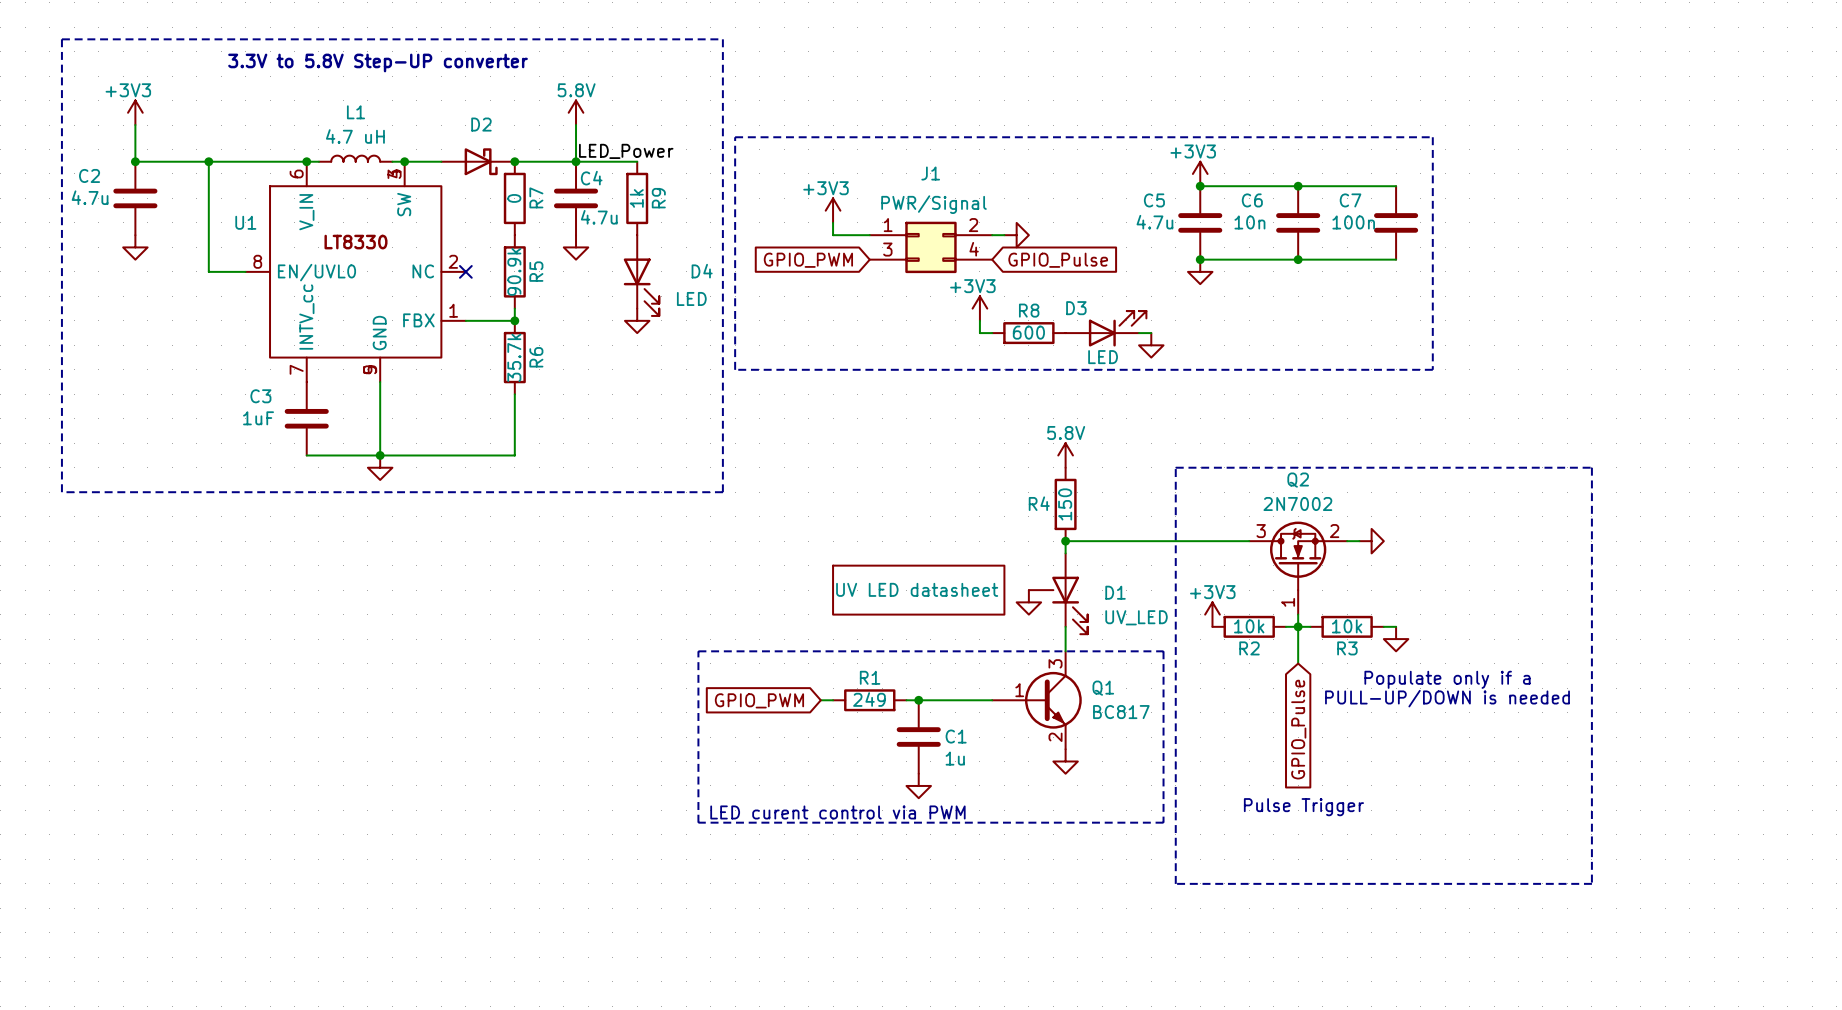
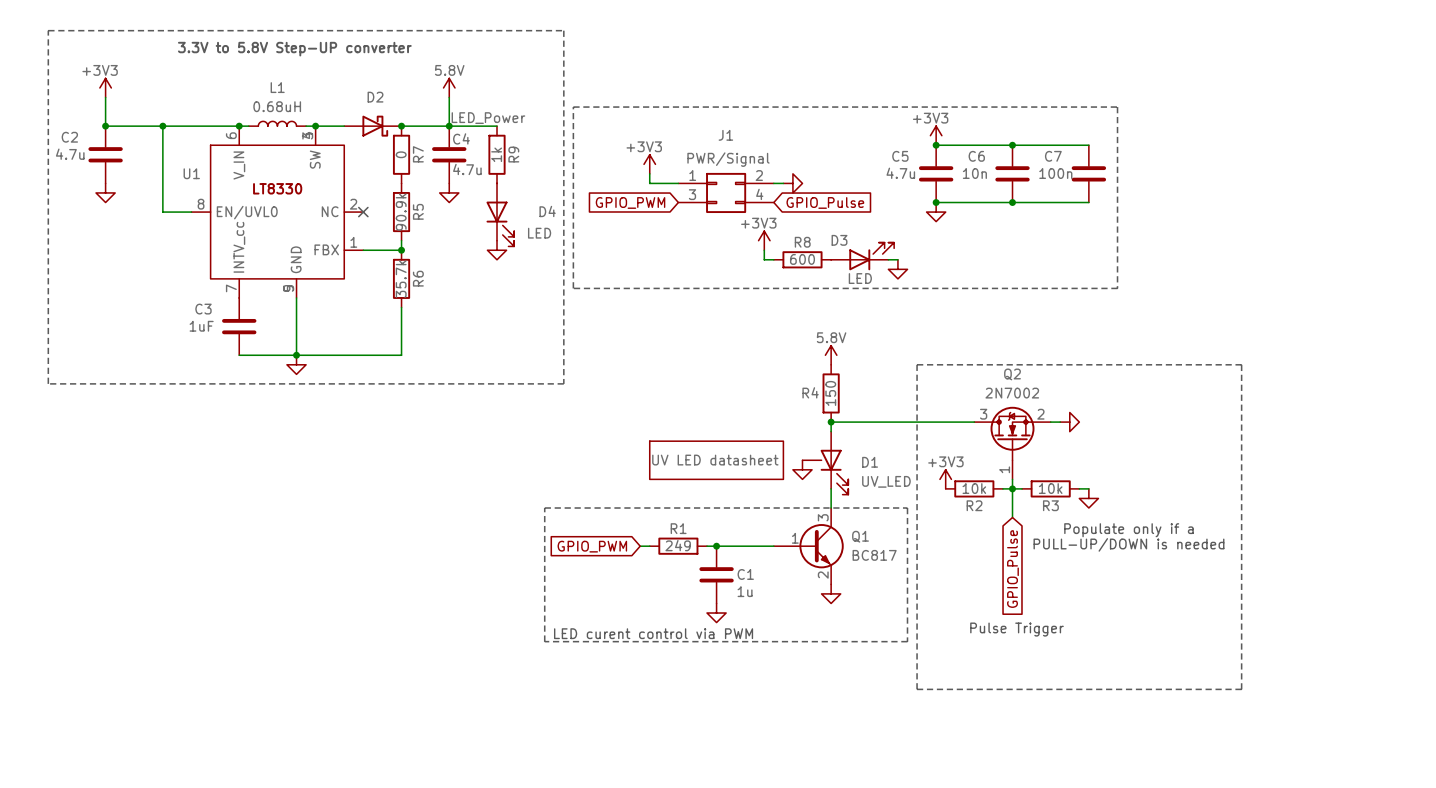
L1 value: 4.7 uH (355, 136) -> 0.68uH (277, 106)

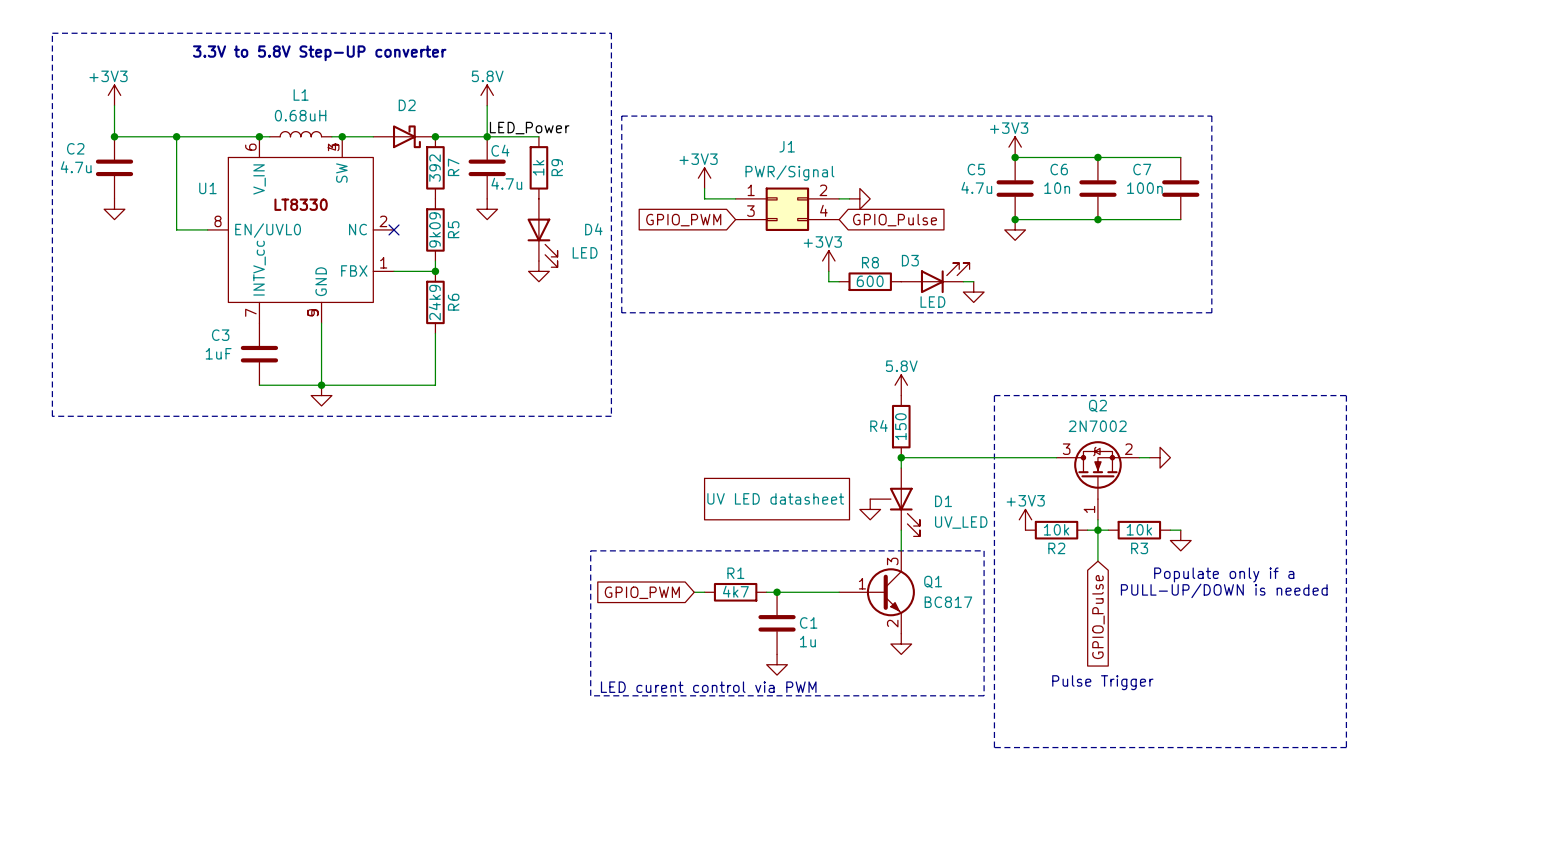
R7 value: 0 (401, 154) -> 392 (435, 168)
R5 value: 90.9k (401, 212) -> 9k09 (435, 229)
R6 value: 35.7k (401, 279) -> 24k9 (434, 302)
R1 value: 249 (678, 545) -> 4k7 (735, 591)

